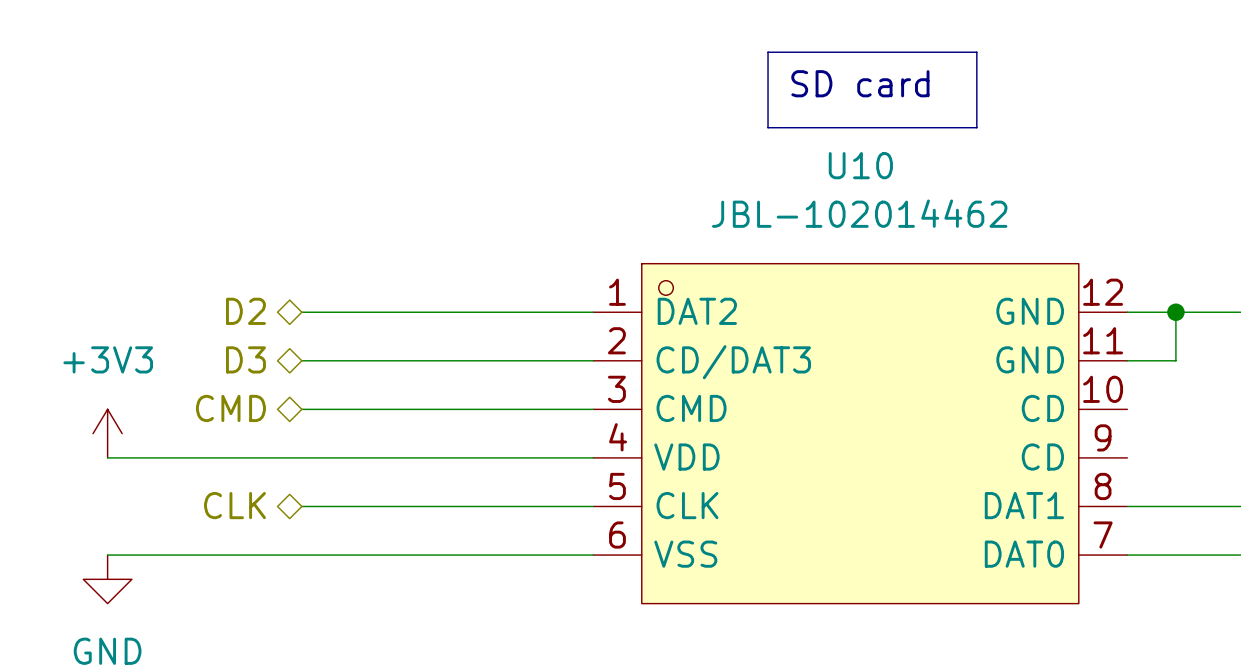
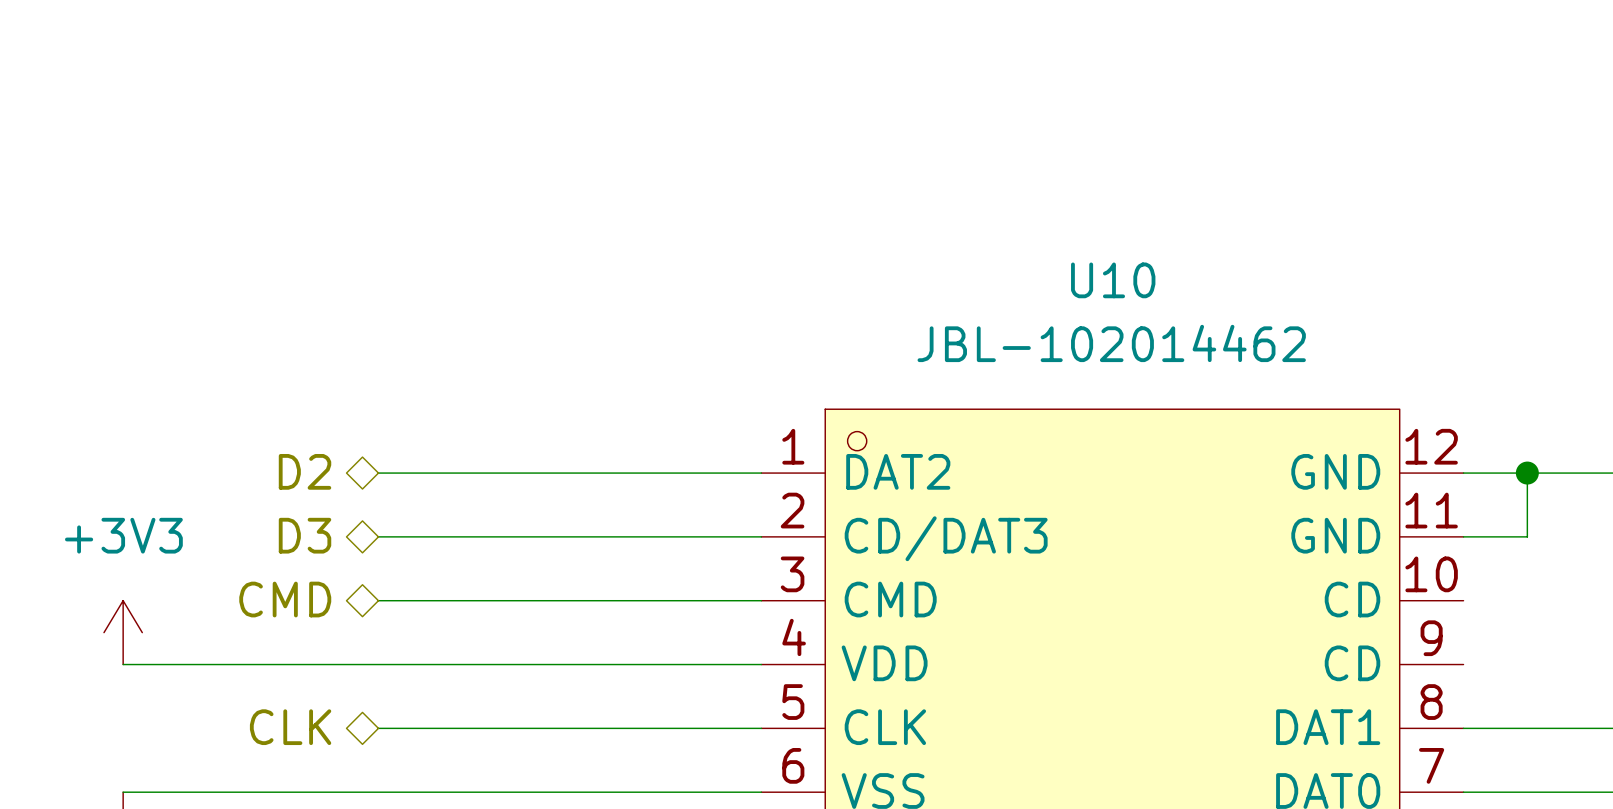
line: (768, 52) (976, 52) (976, 127) (768, 127) (768, 52) -> none
text: SD card (860, 83) -> none

